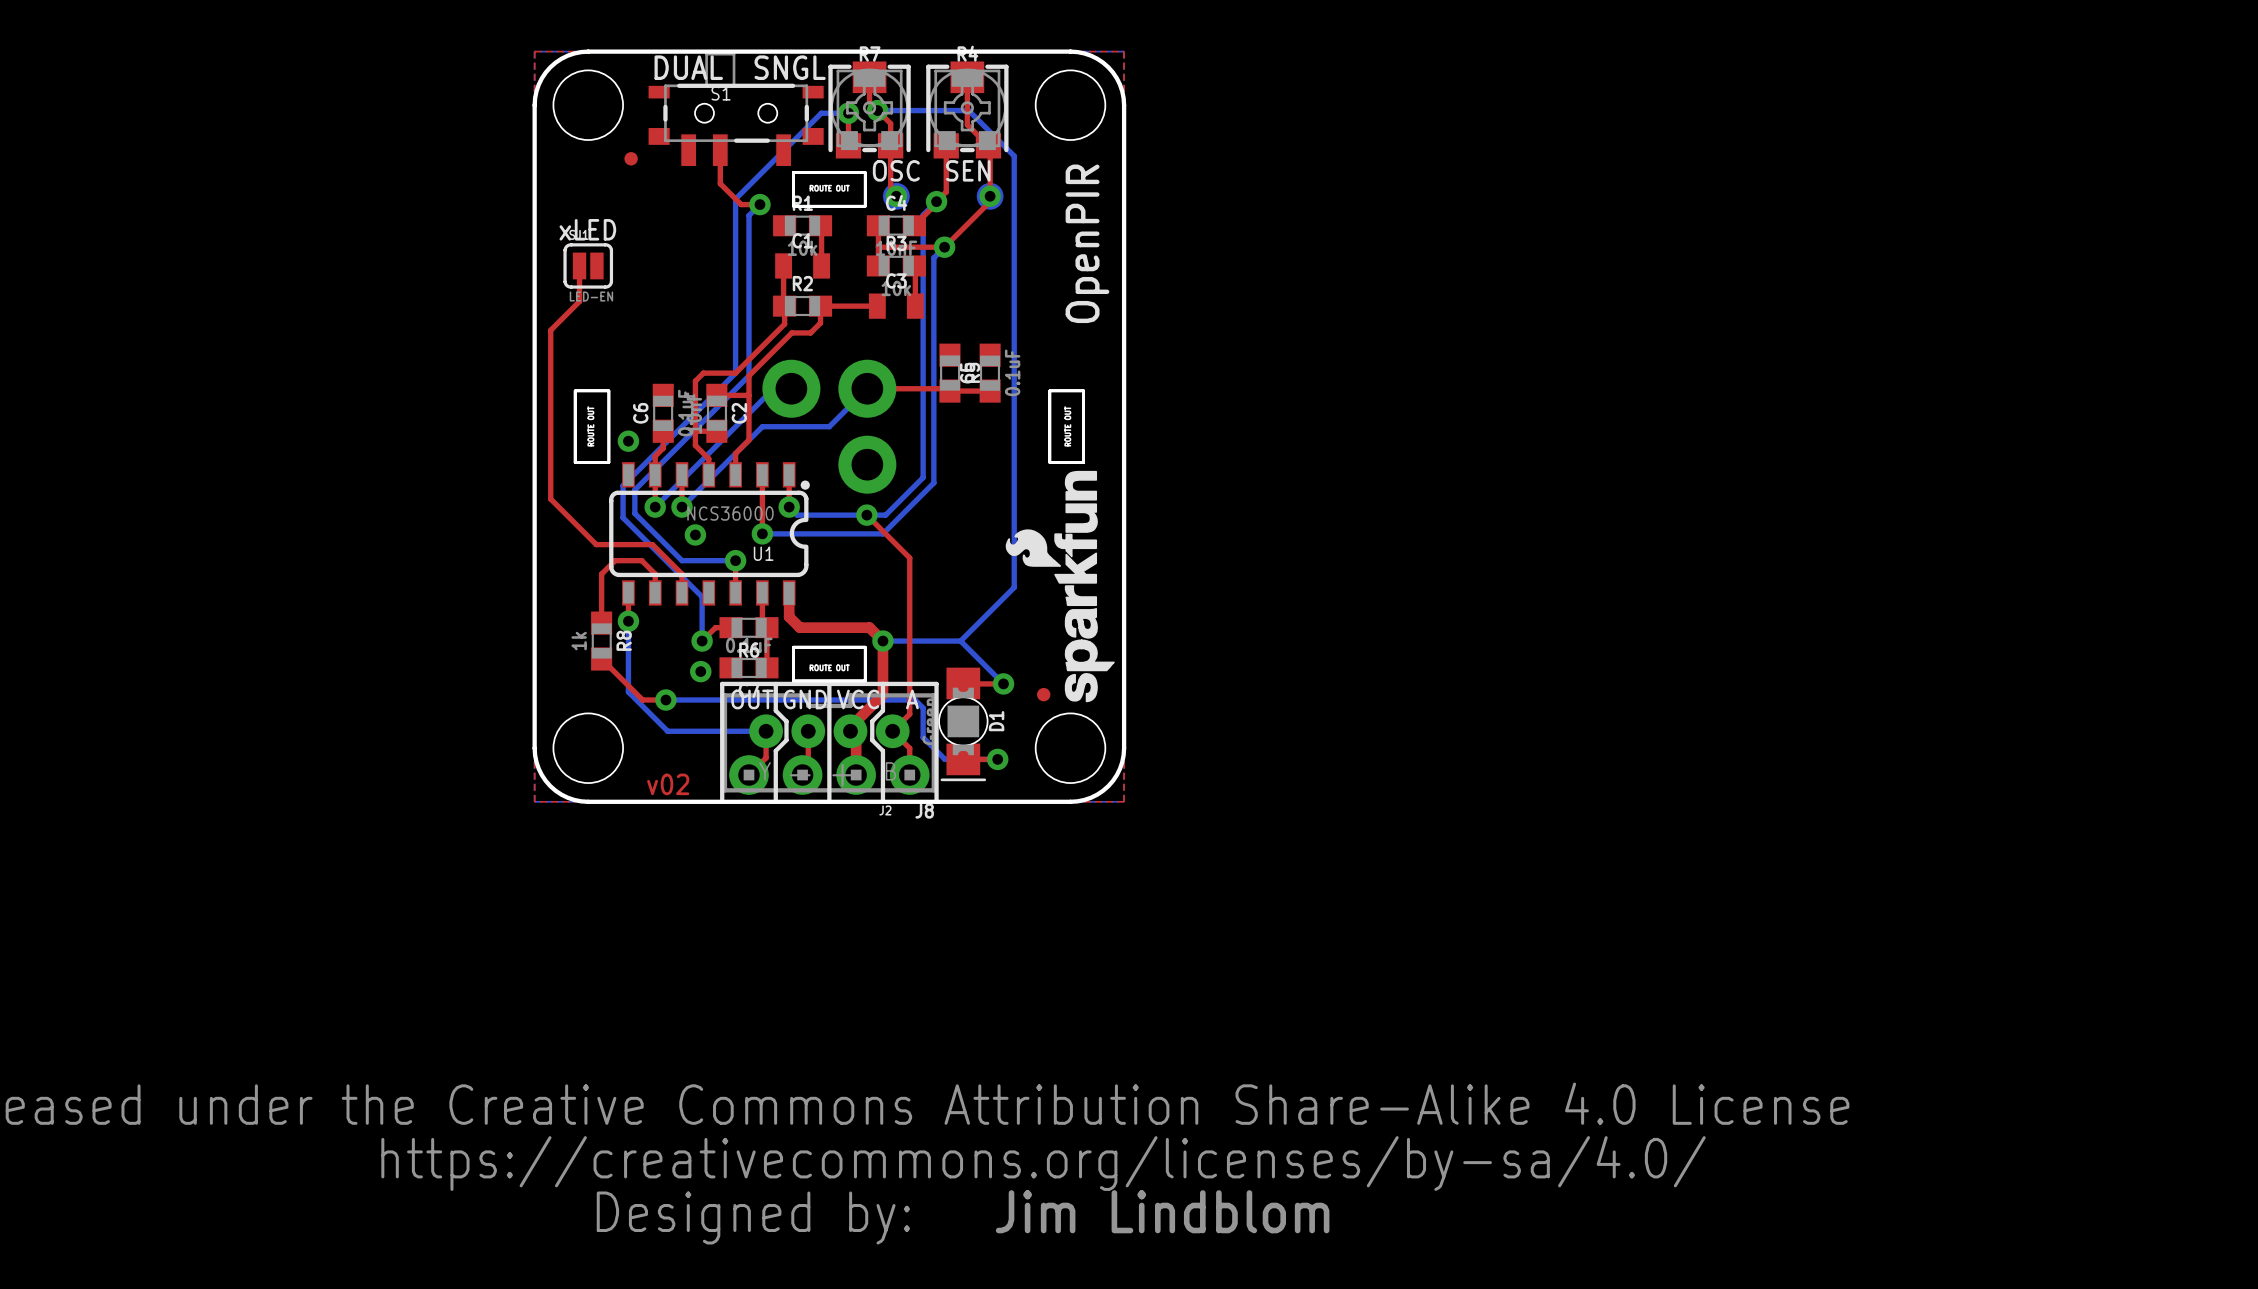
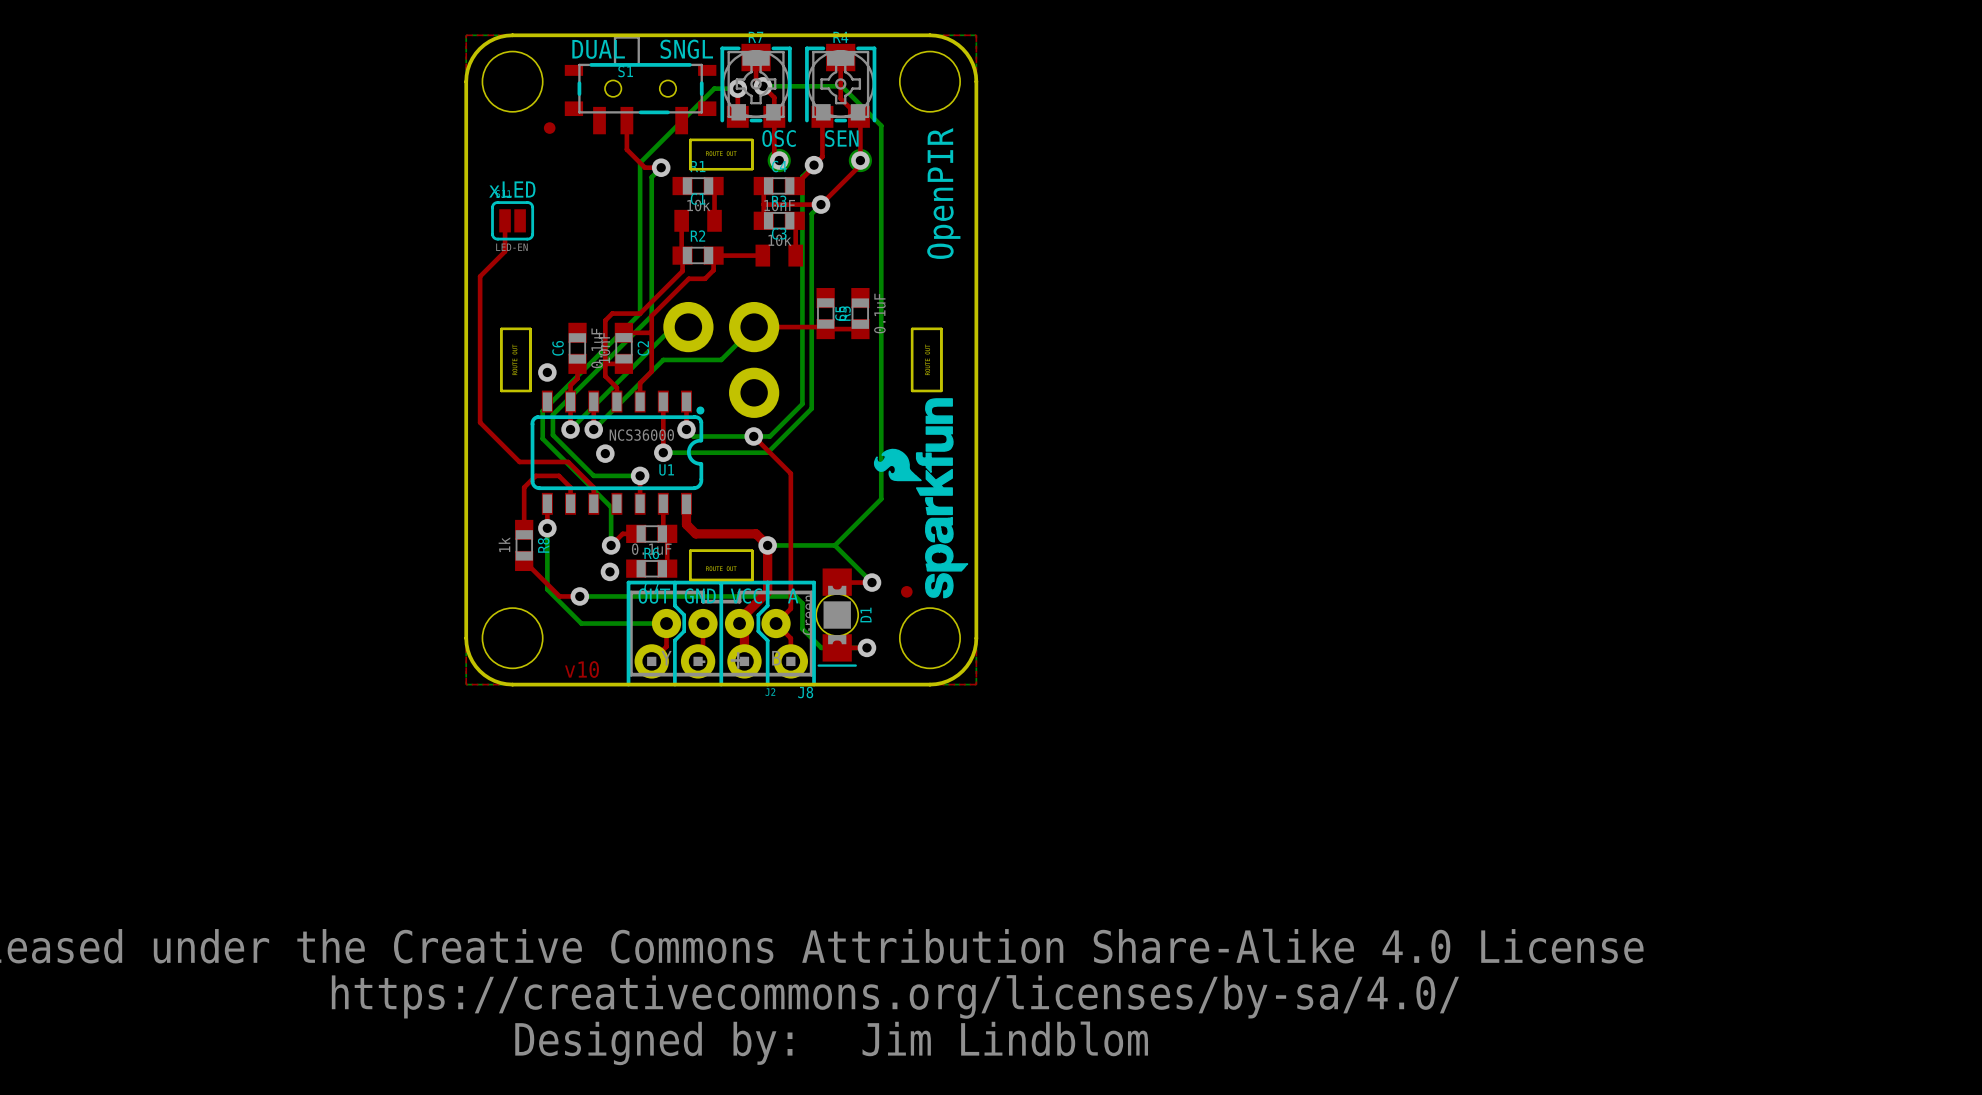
text: v02 (668, 784) -> v10 (581, 669)

